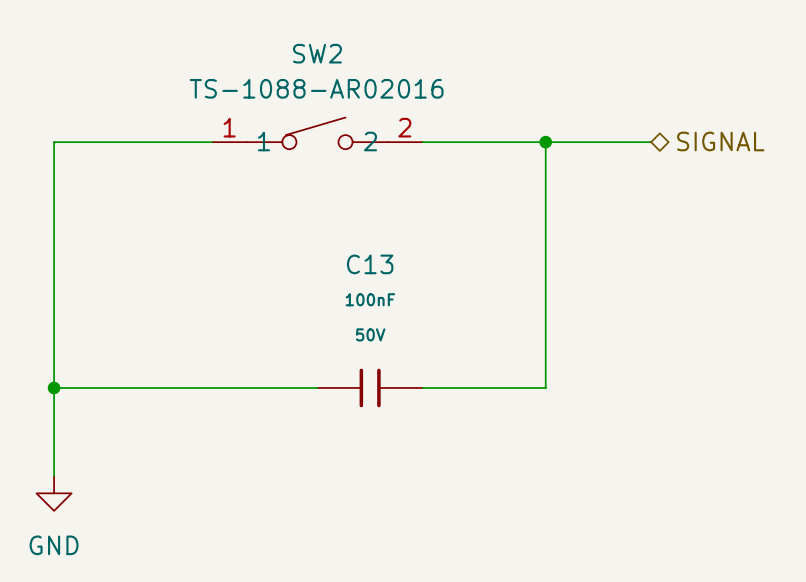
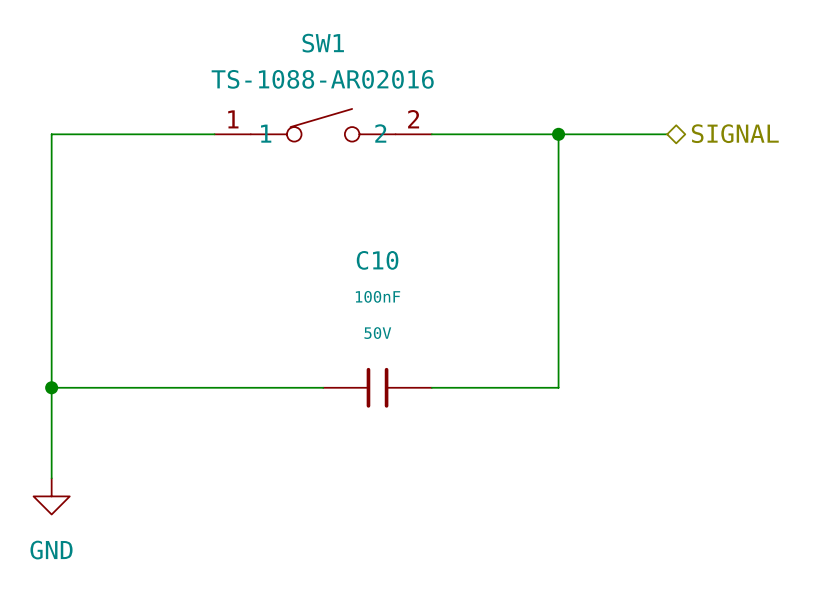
SW2 name: SW2 (317, 53) -> SW1 (323, 43)
C13 name: C13 (370, 264) -> C10 (377, 260)

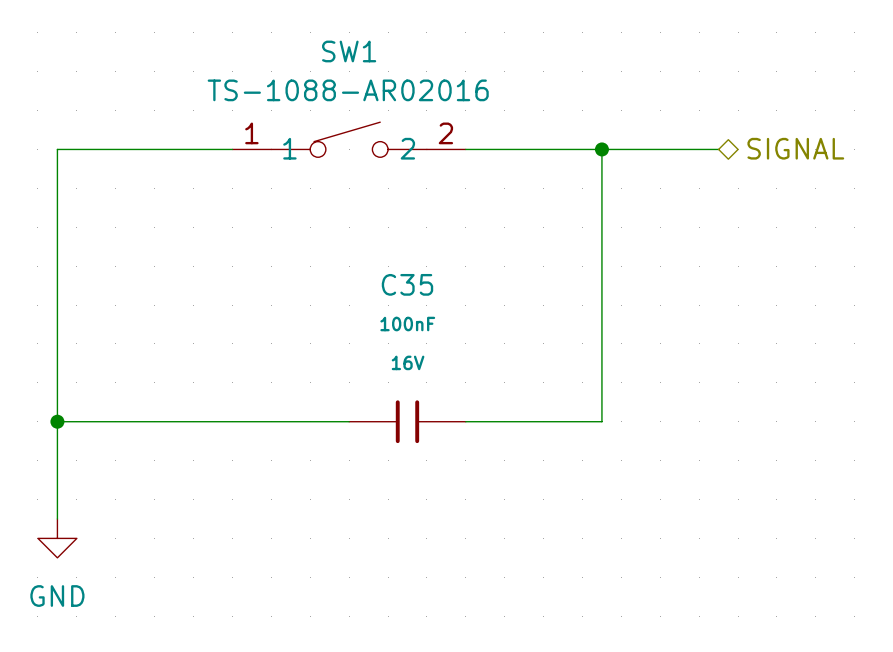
C10 name: C10 (377, 260) -> C35 (407, 284)
C10 text: 50V (377, 333) -> 16V (408, 362)

